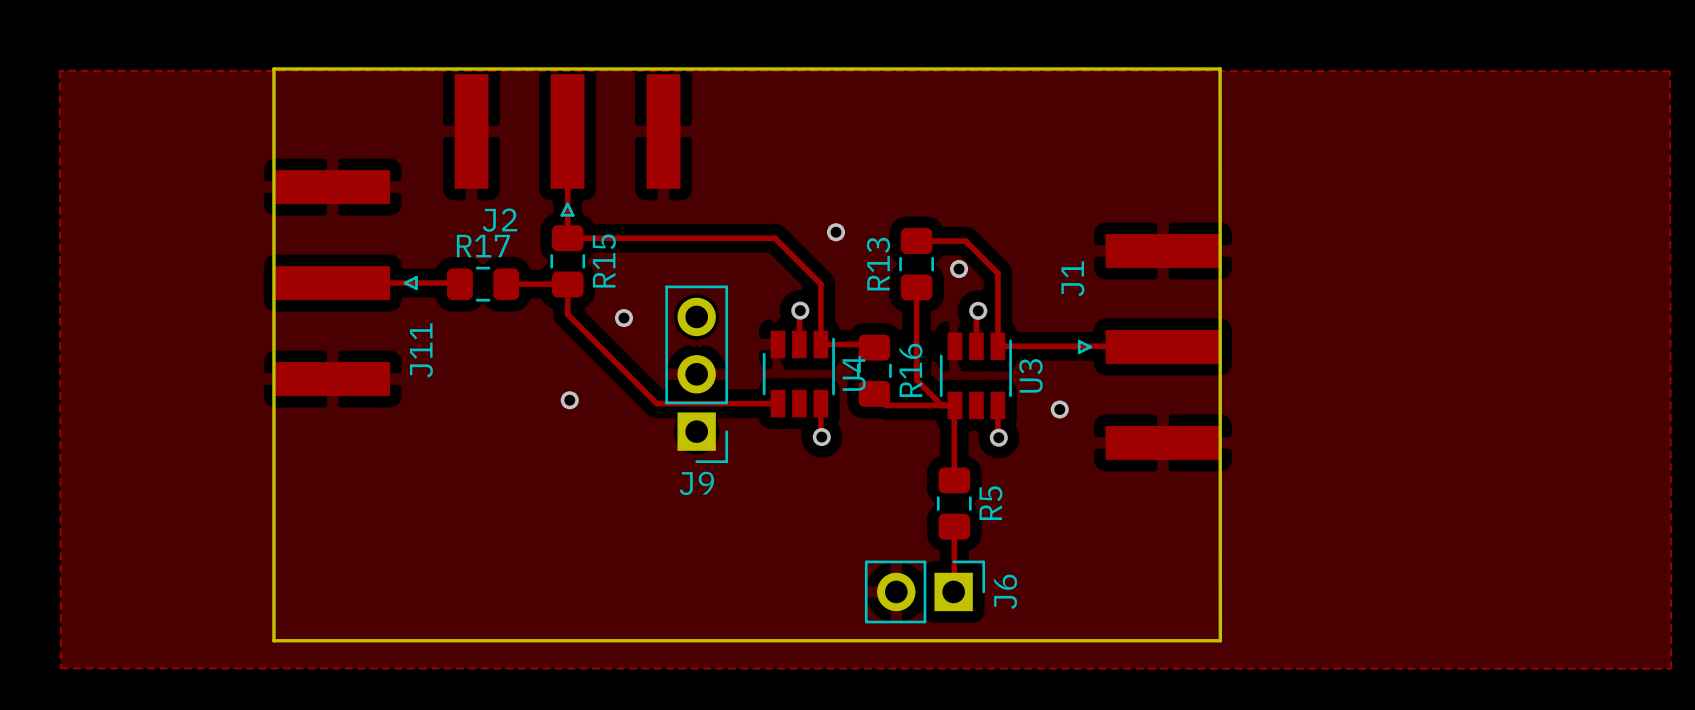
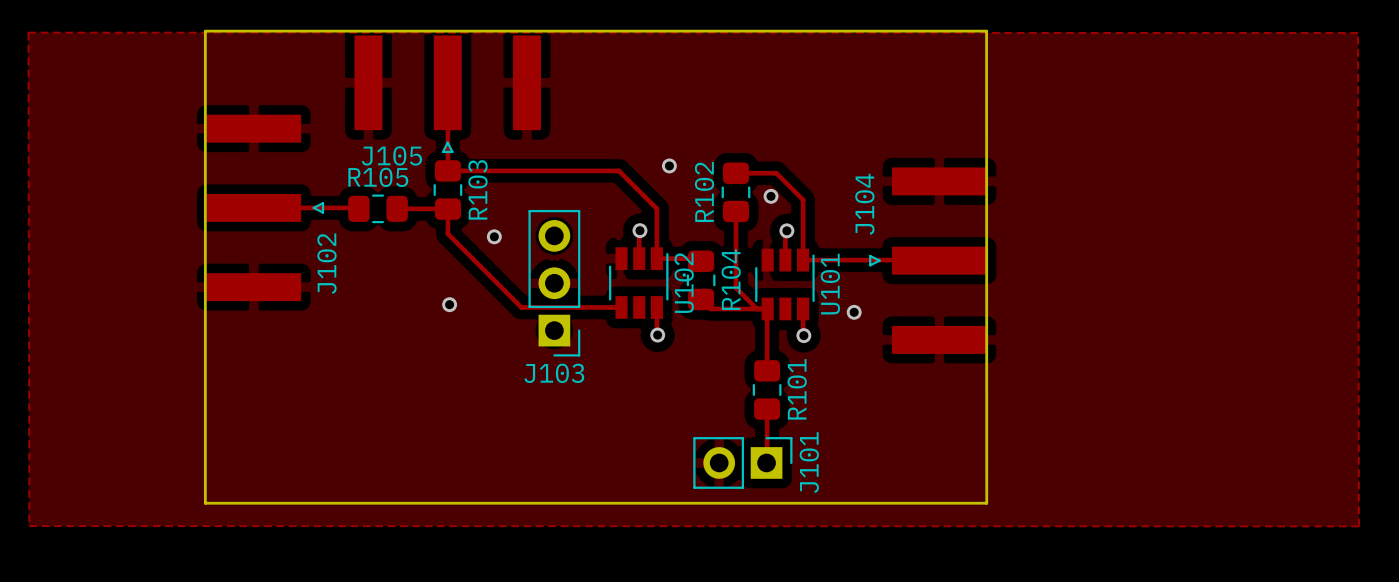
J2 name: J2 (499, 220) -> J105 (391, 155)
R17 name: R17 (483, 246) -> R105 (378, 177)
R15 name: R15 (604, 261) -> R103 (477, 189)
R13 name: R13 (878, 264) -> R102 (704, 191)
J1 name: J1 (1072, 278) -> J104 (864, 204)
J11 name: J11 (421, 350) -> J102 (326, 263)
R16 name: R16 (911, 370) -> R104 (731, 279)
U4 name: U4 (854, 373) -> U102 (684, 282)
U3 name: U3 (1030, 375) -> U101 (830, 284)
J9 name: J9 (696, 483) -> J103 (554, 373)
R5 name: R5 (990, 503) -> R101 (797, 389)
J6 name: J6 (1005, 591) -> J101 (809, 462)

